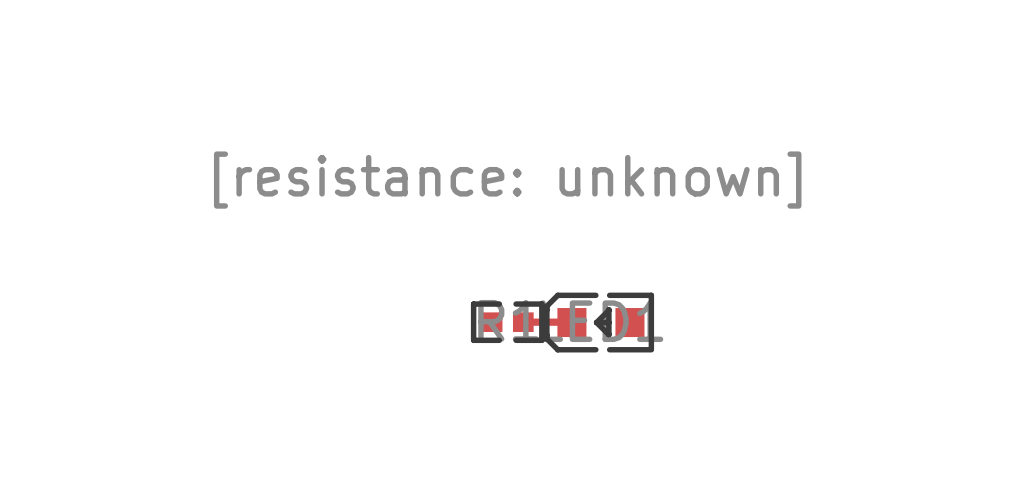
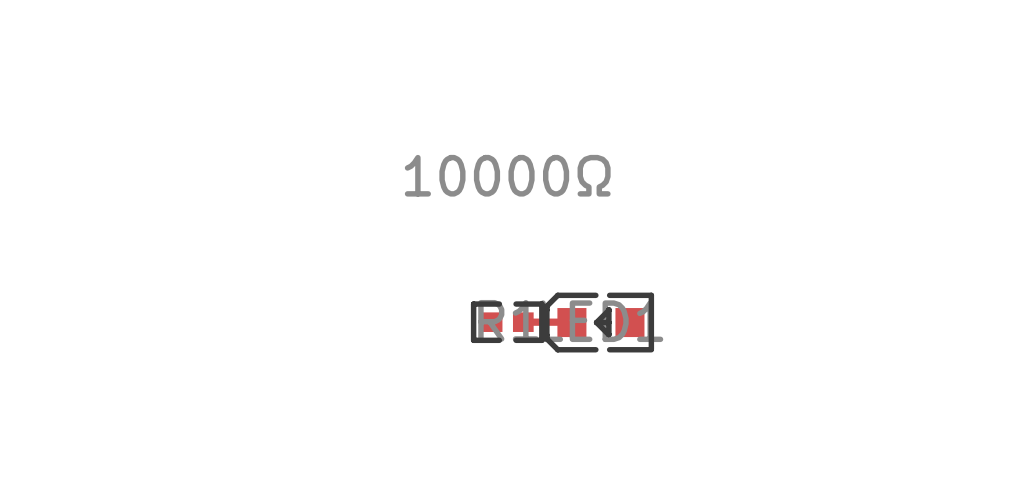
part value: [resistance: unknown] (507, 180) -> 10000Ω (507, 175)

